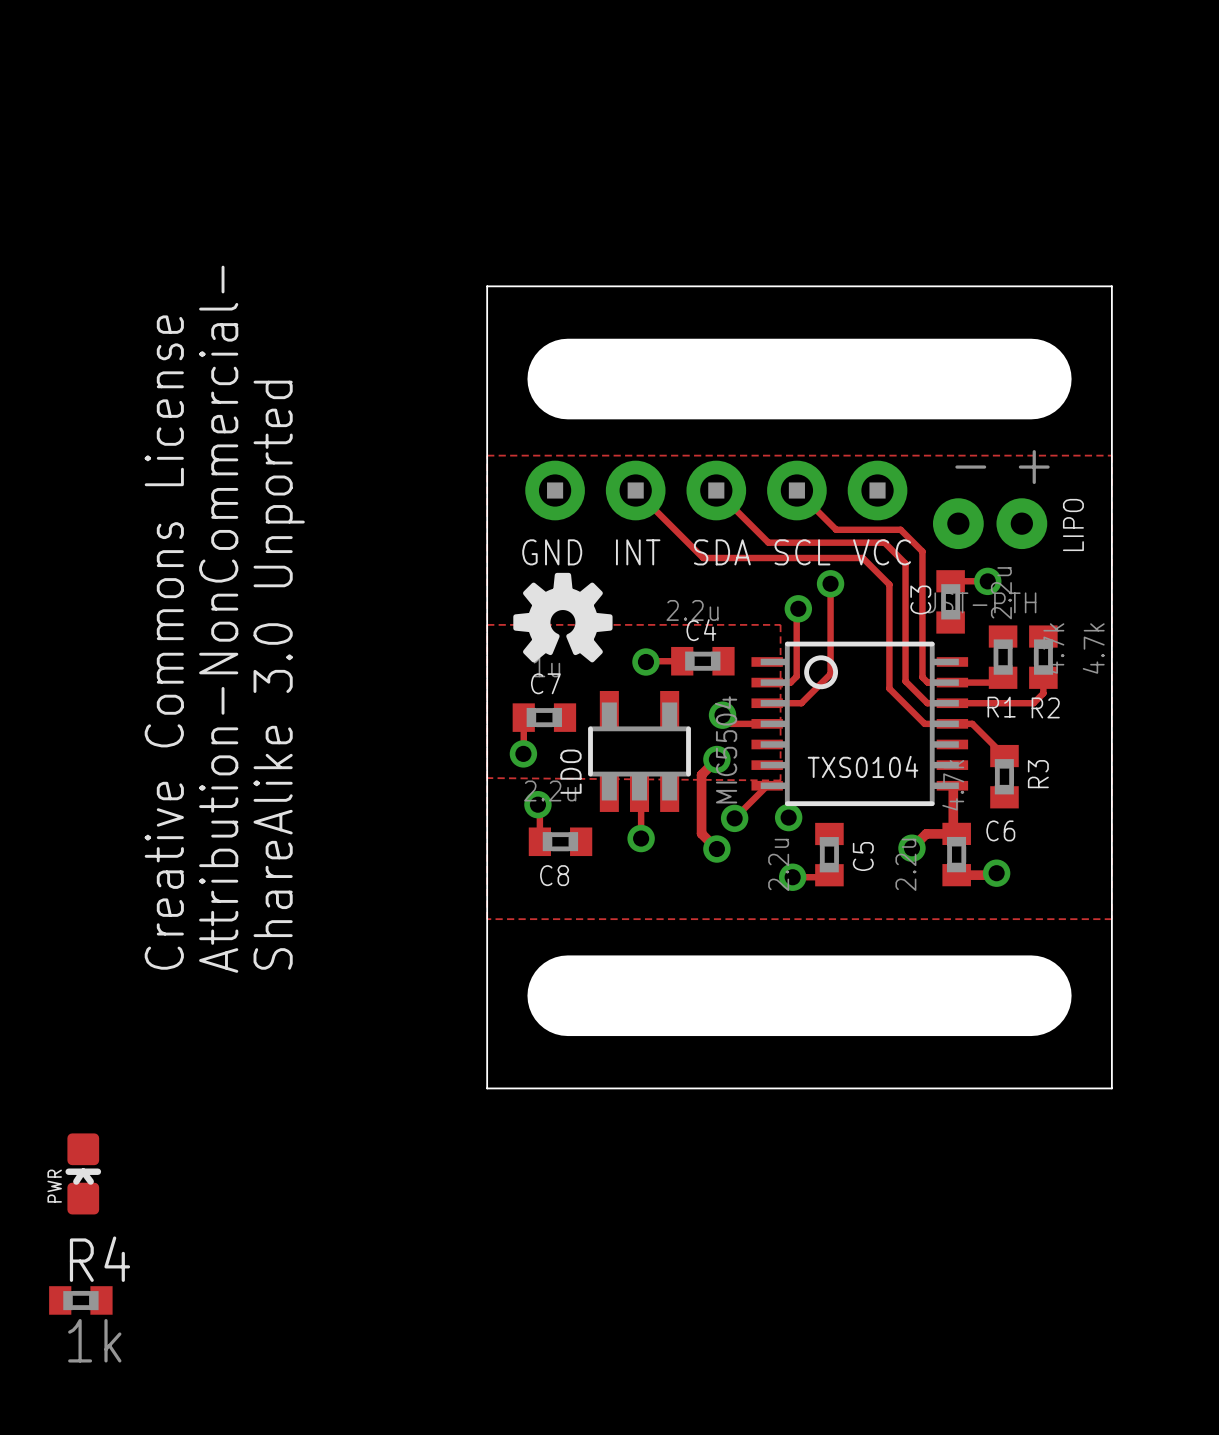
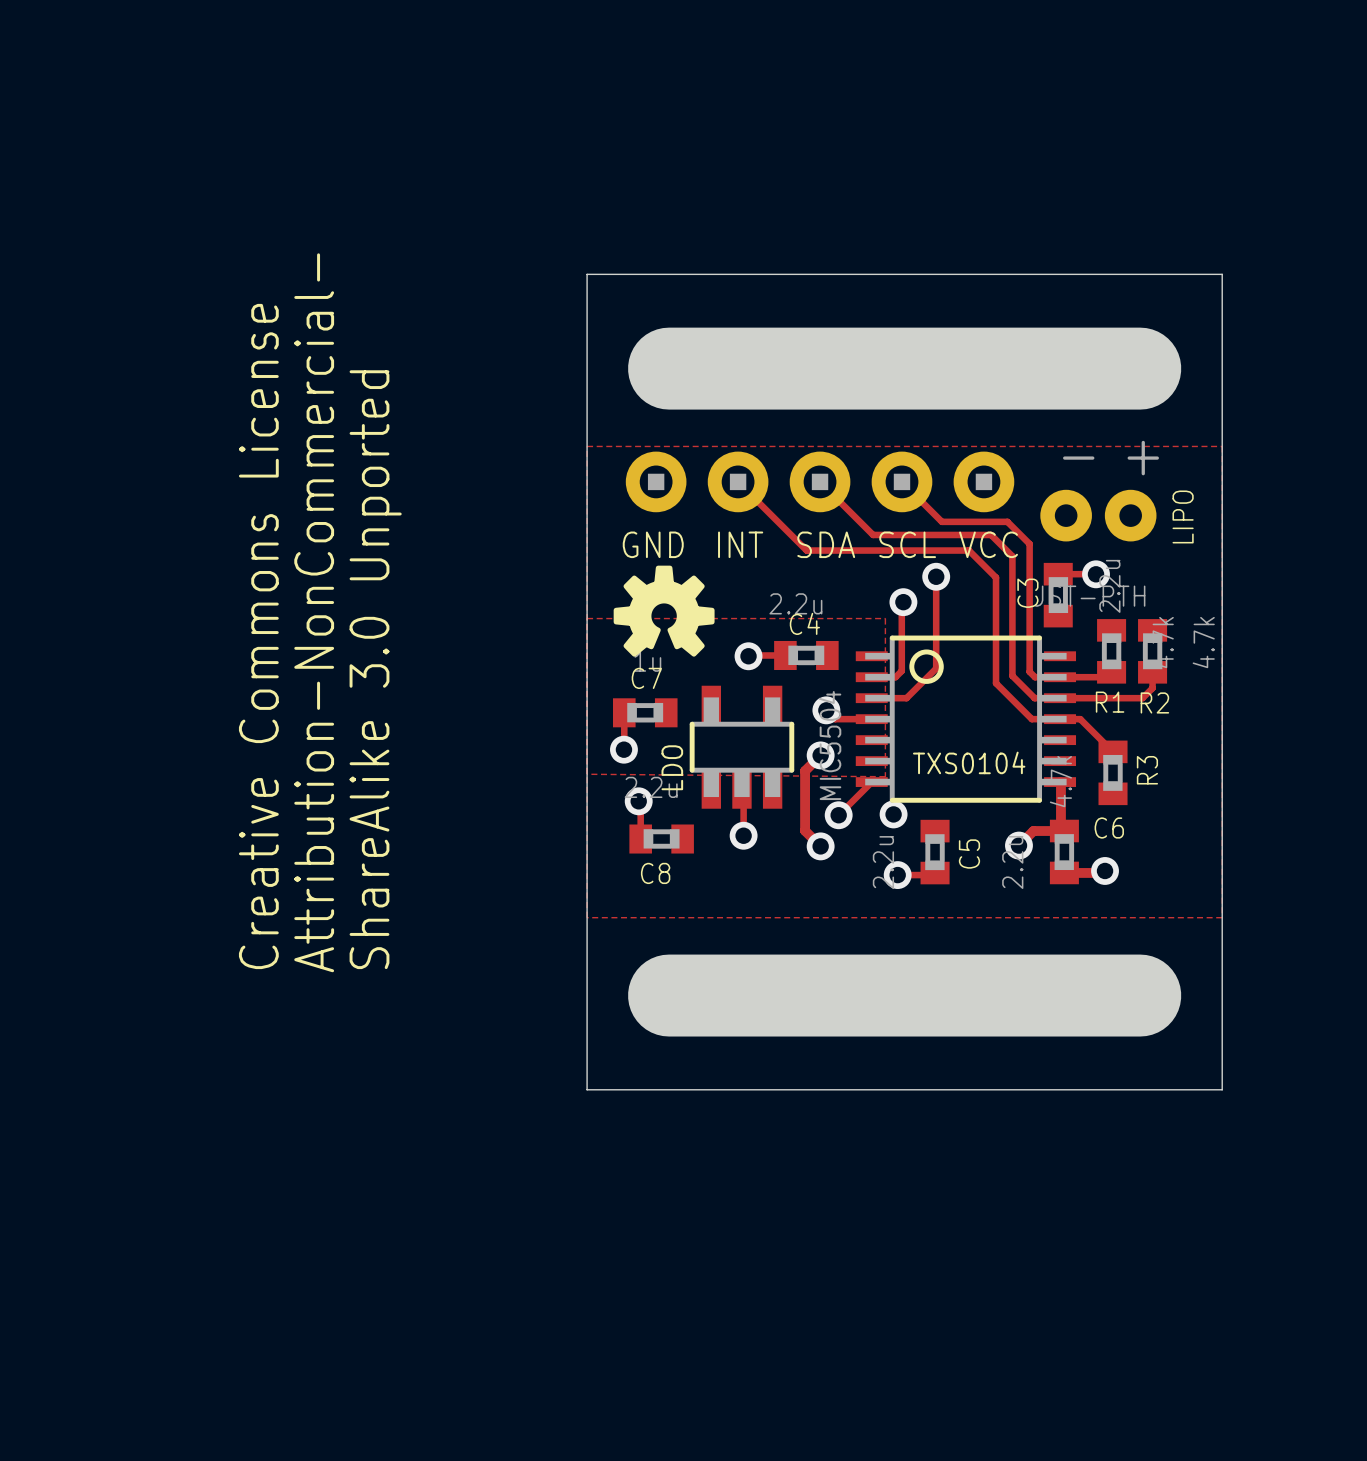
PWR: (83, 1173) -> none
R4: 1k (80, 1300) -> none

